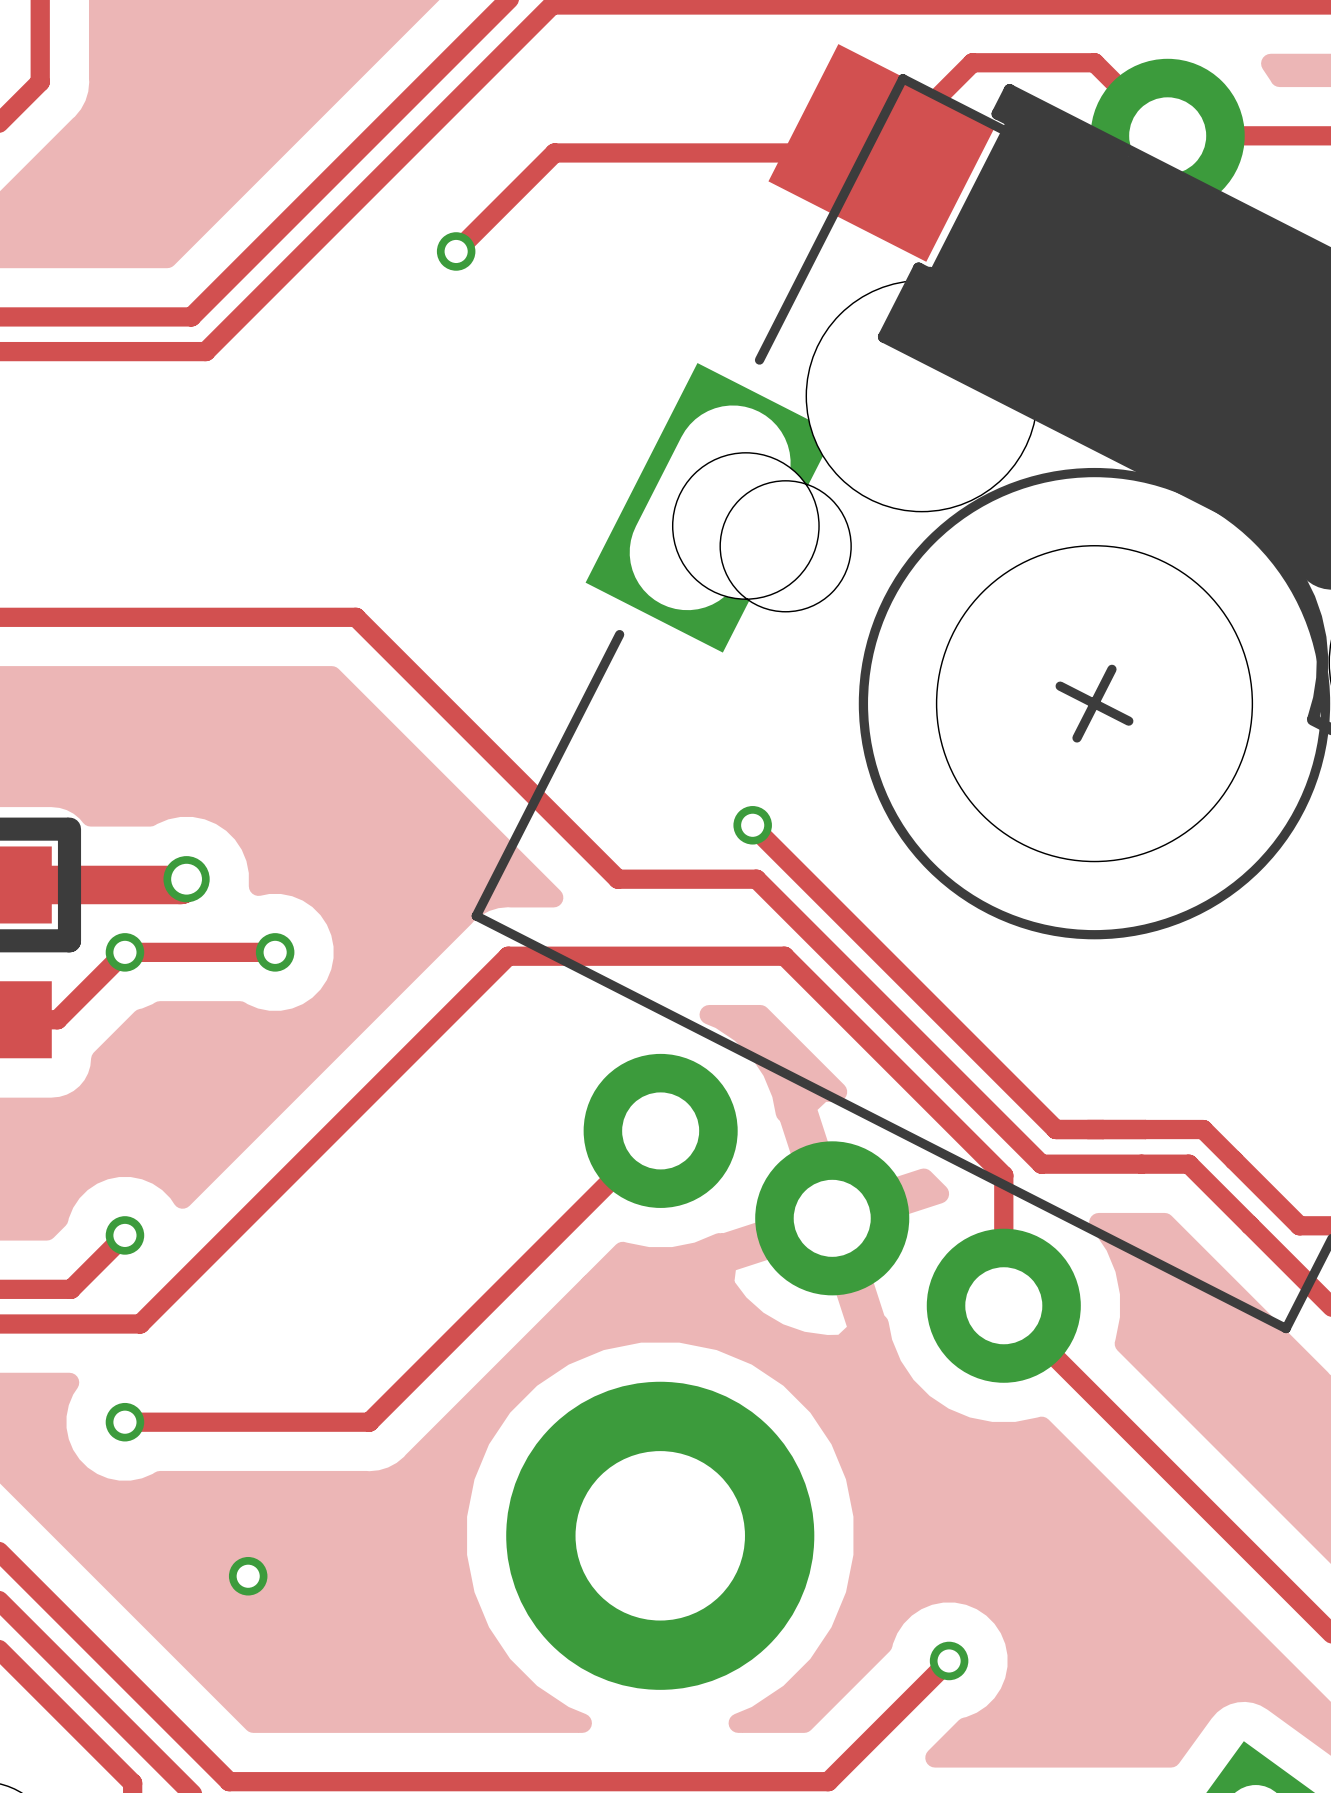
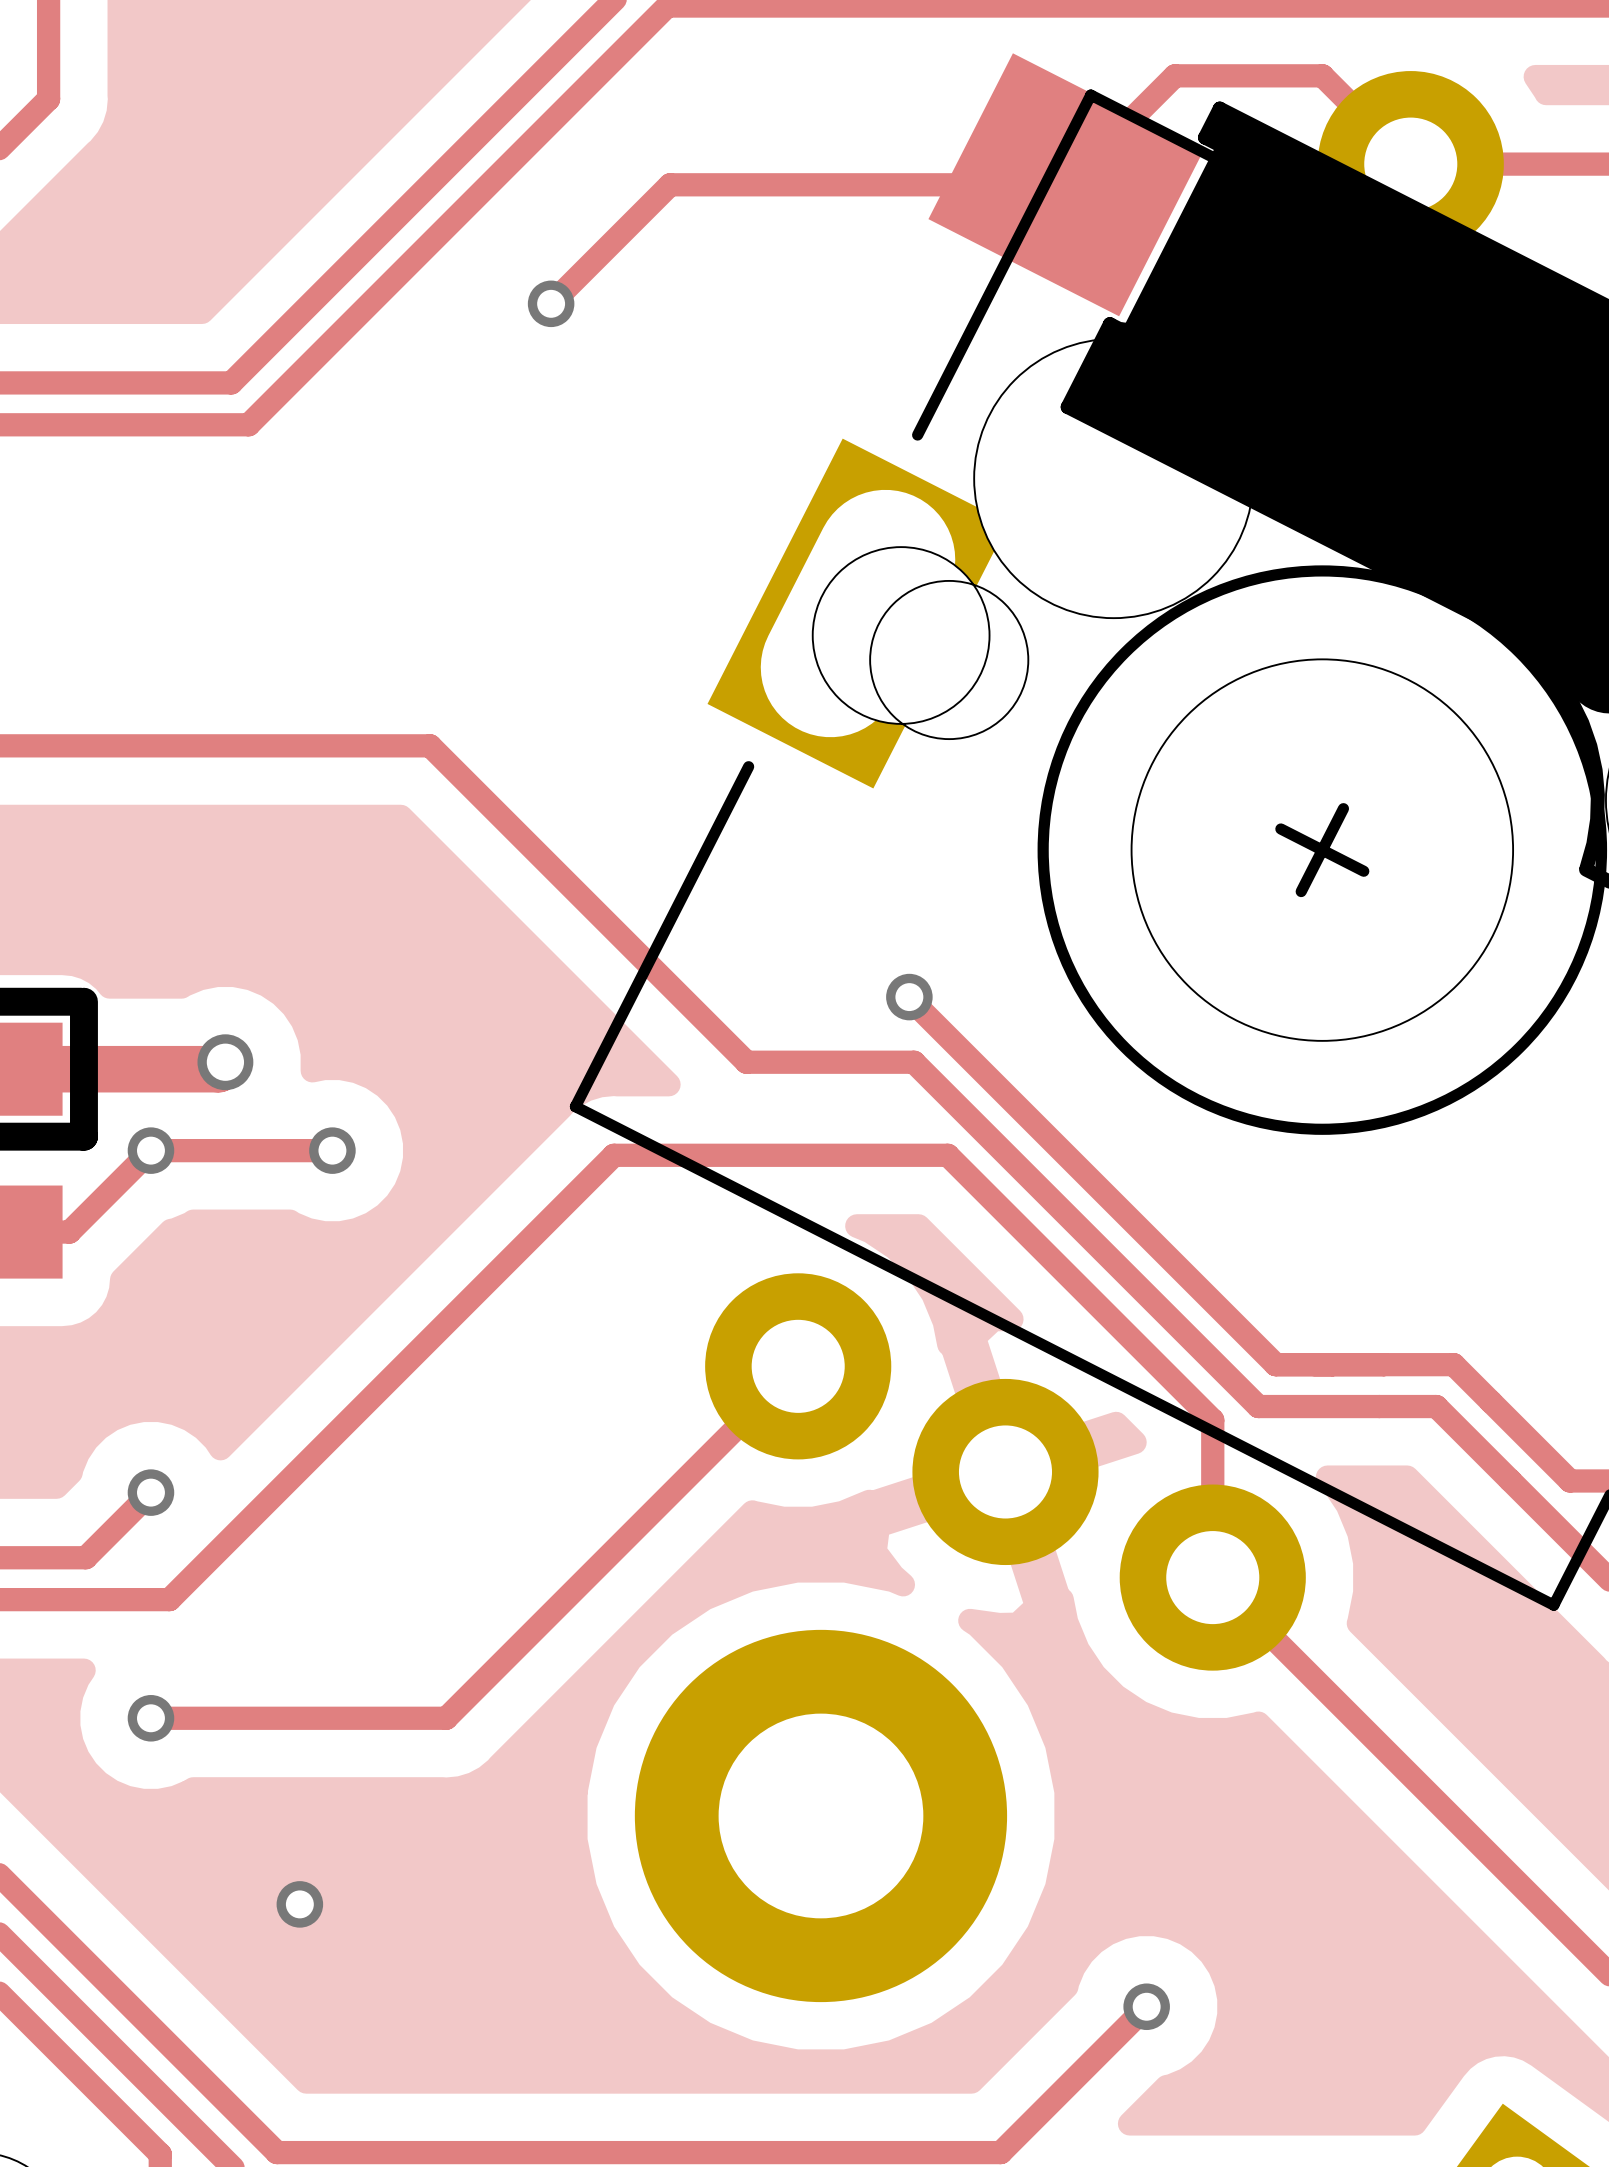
part position: (660, 1535) -> (820, 1815)

